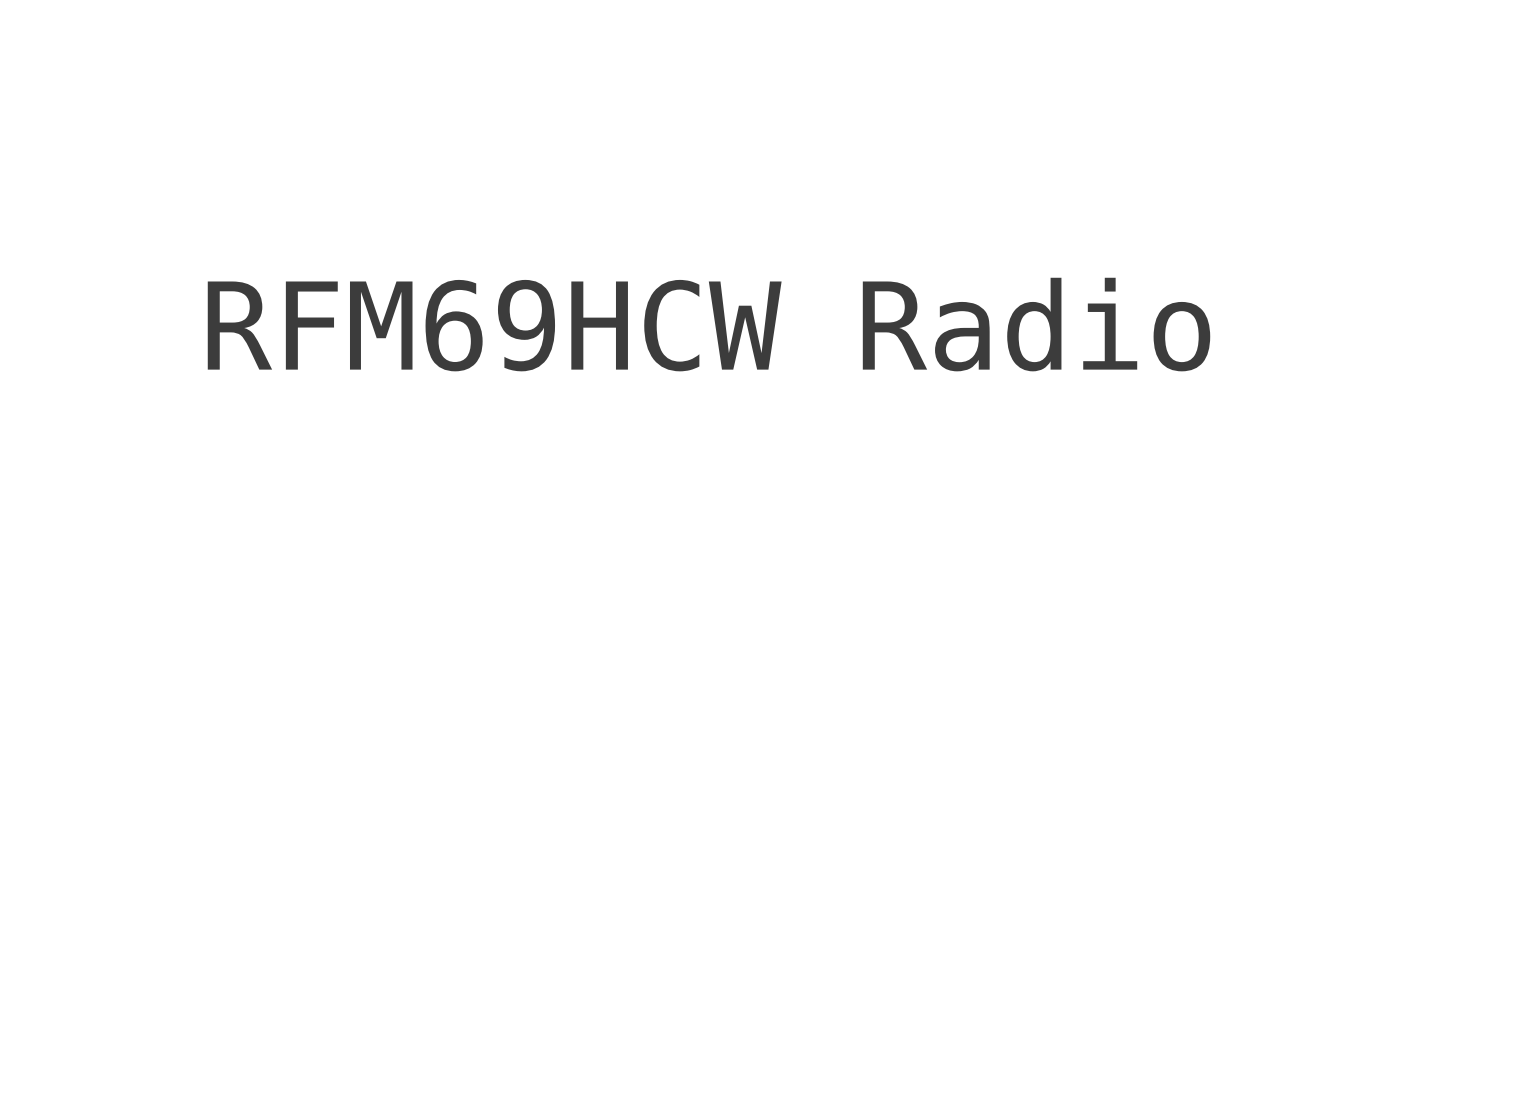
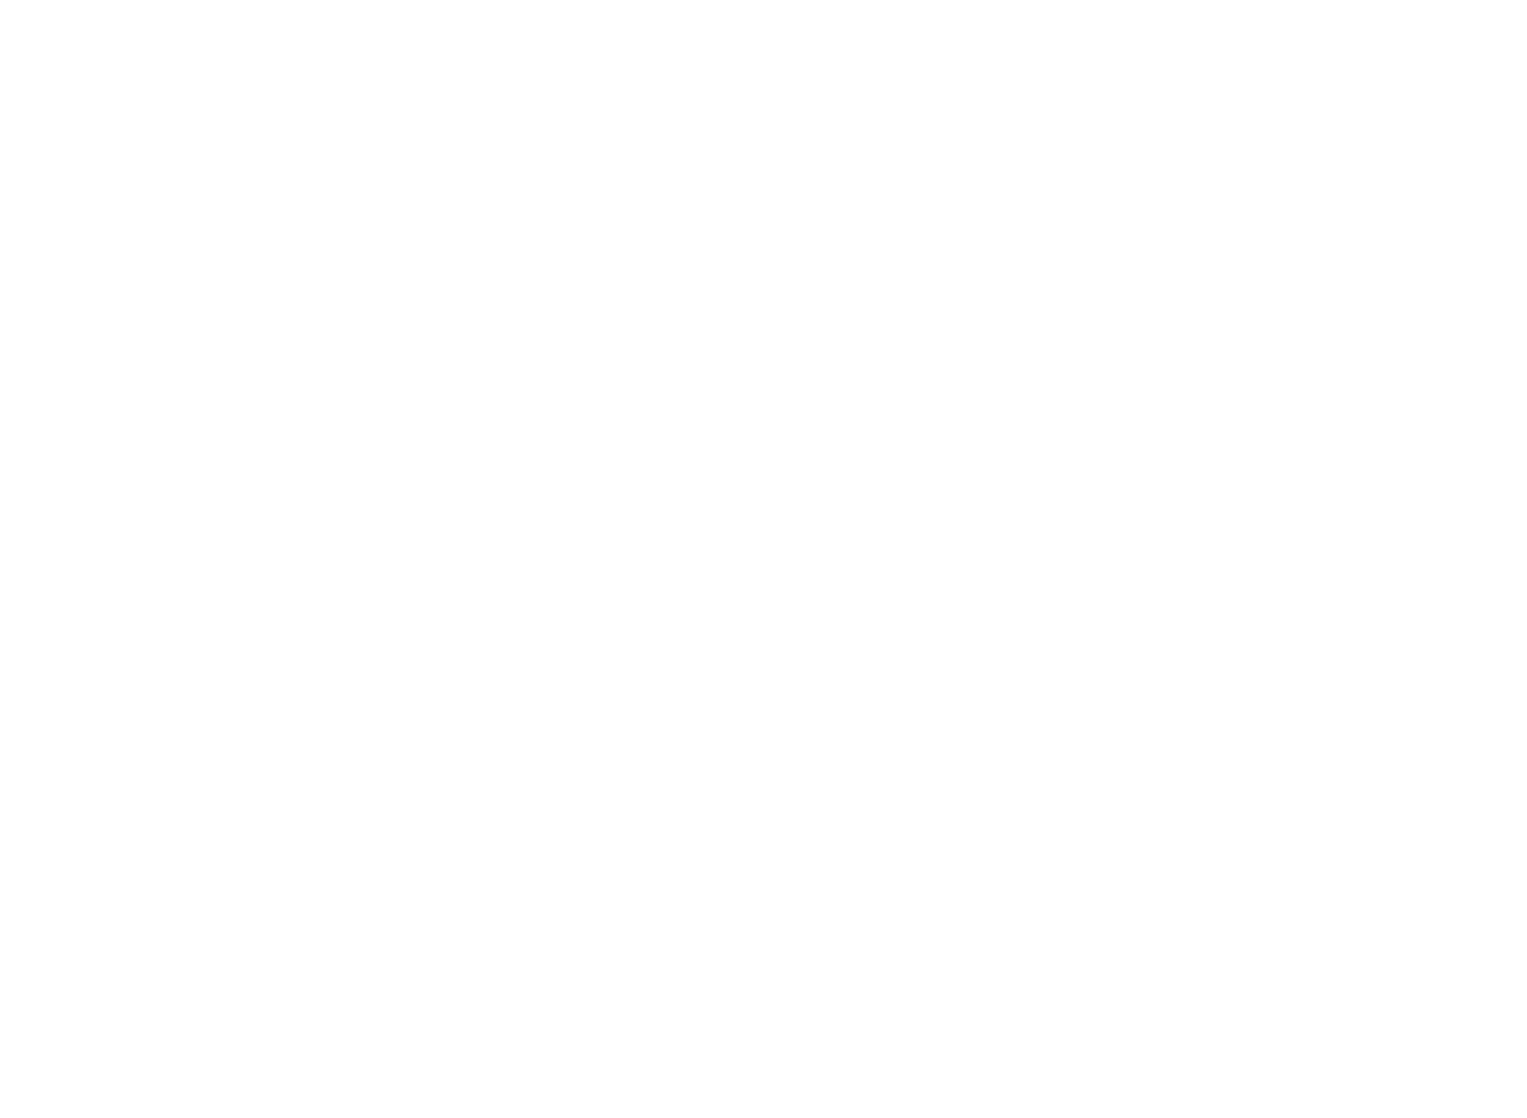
part text: RFM69HCW Radio (708, 324) -> none

